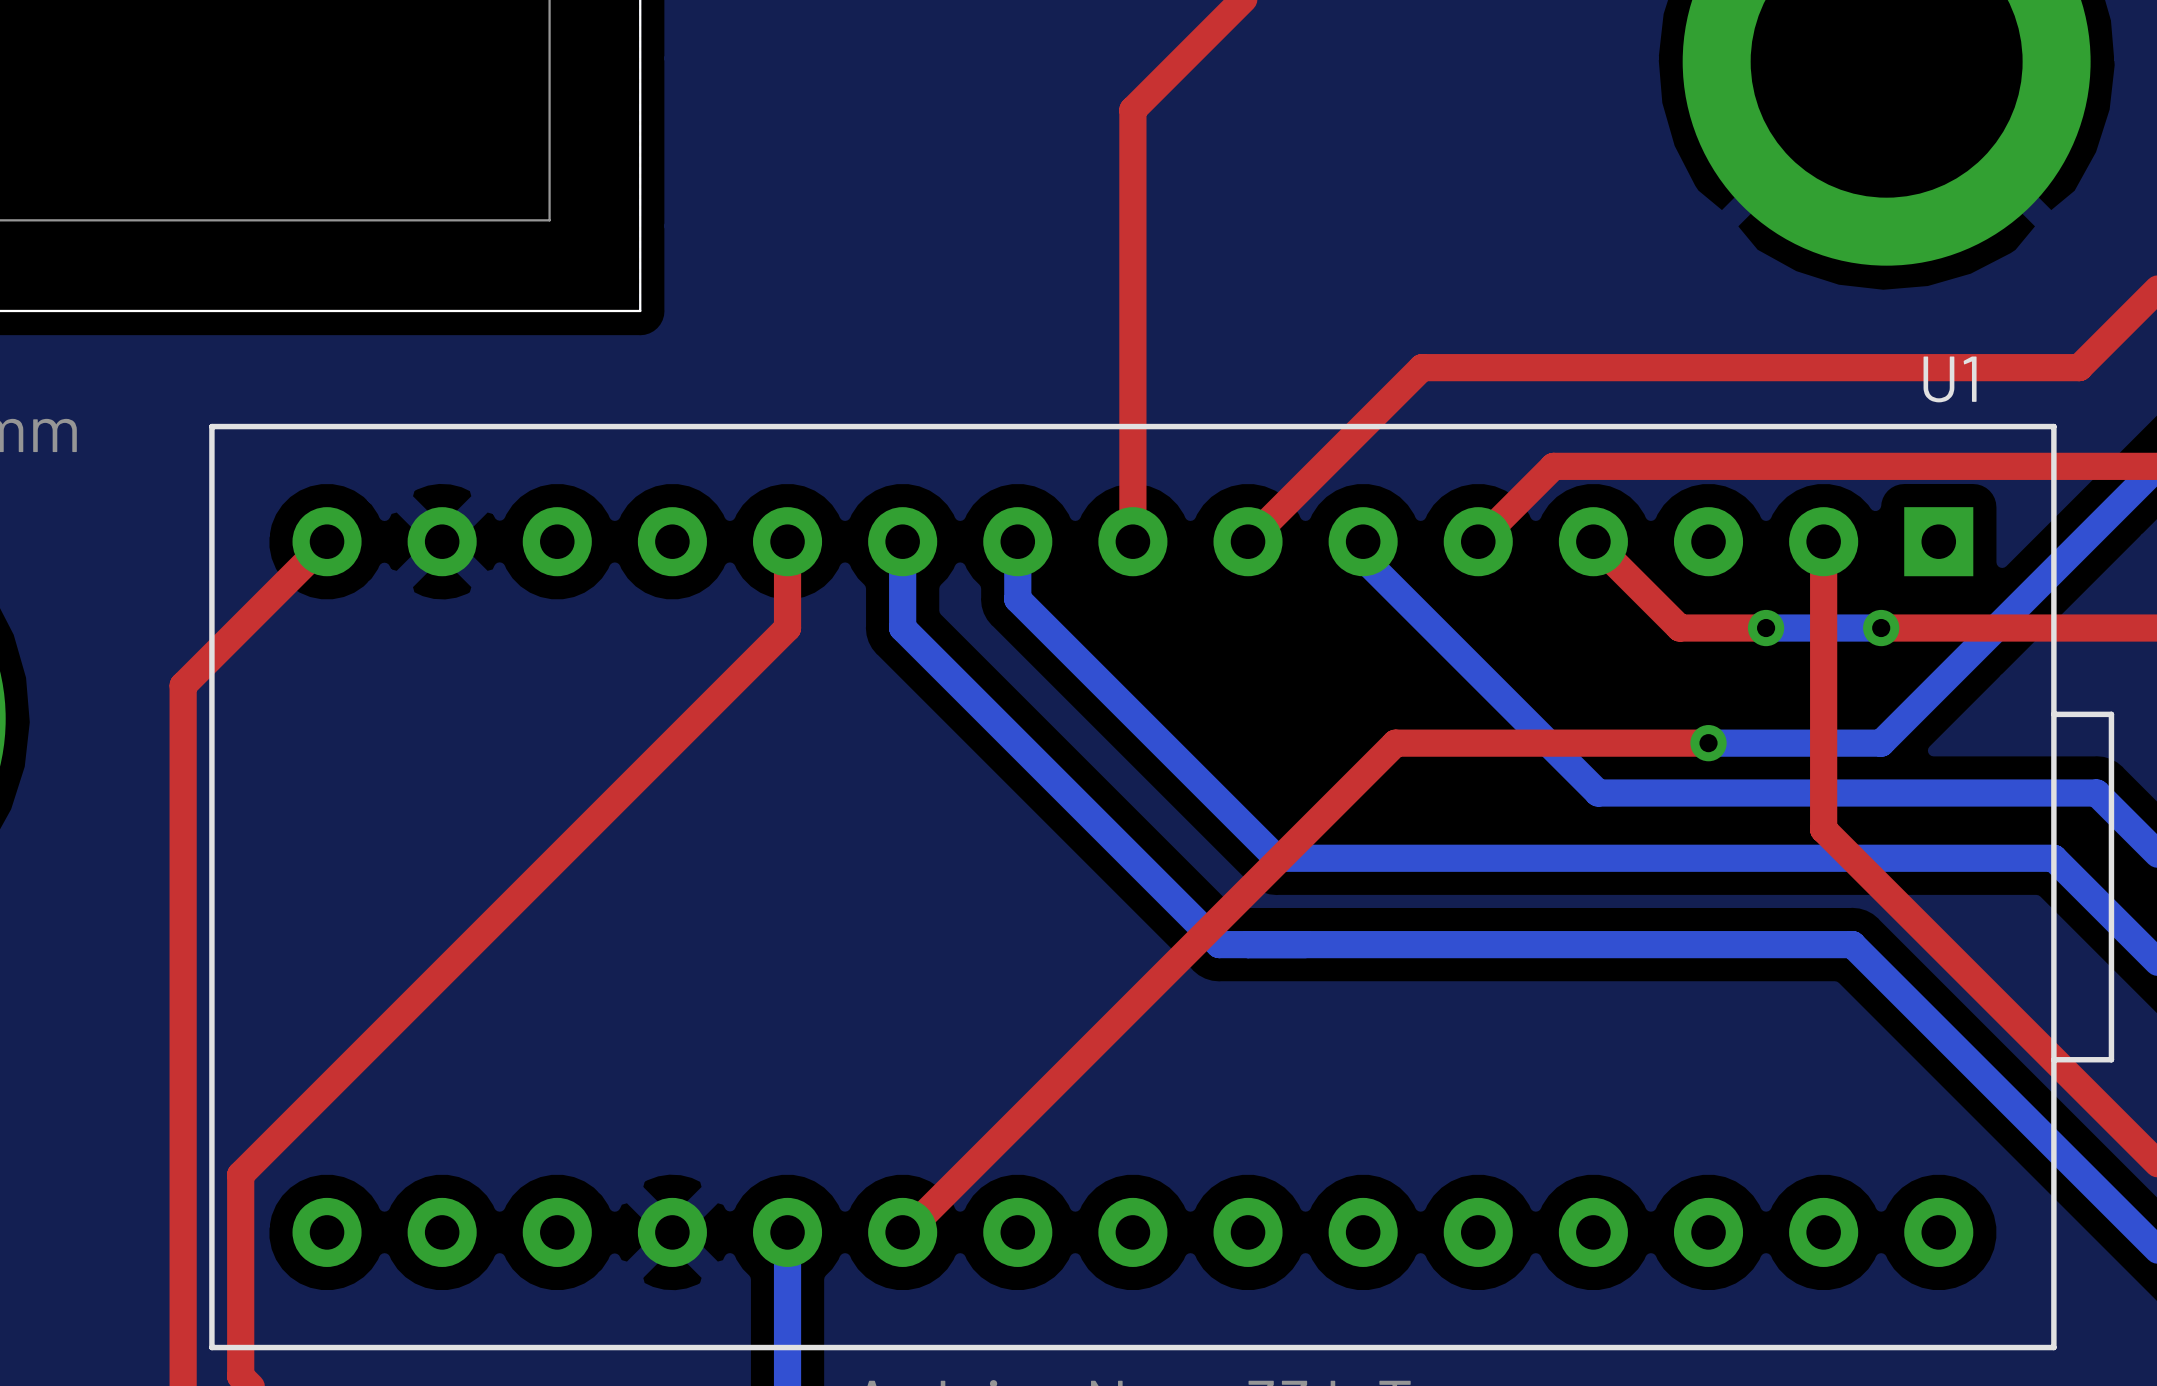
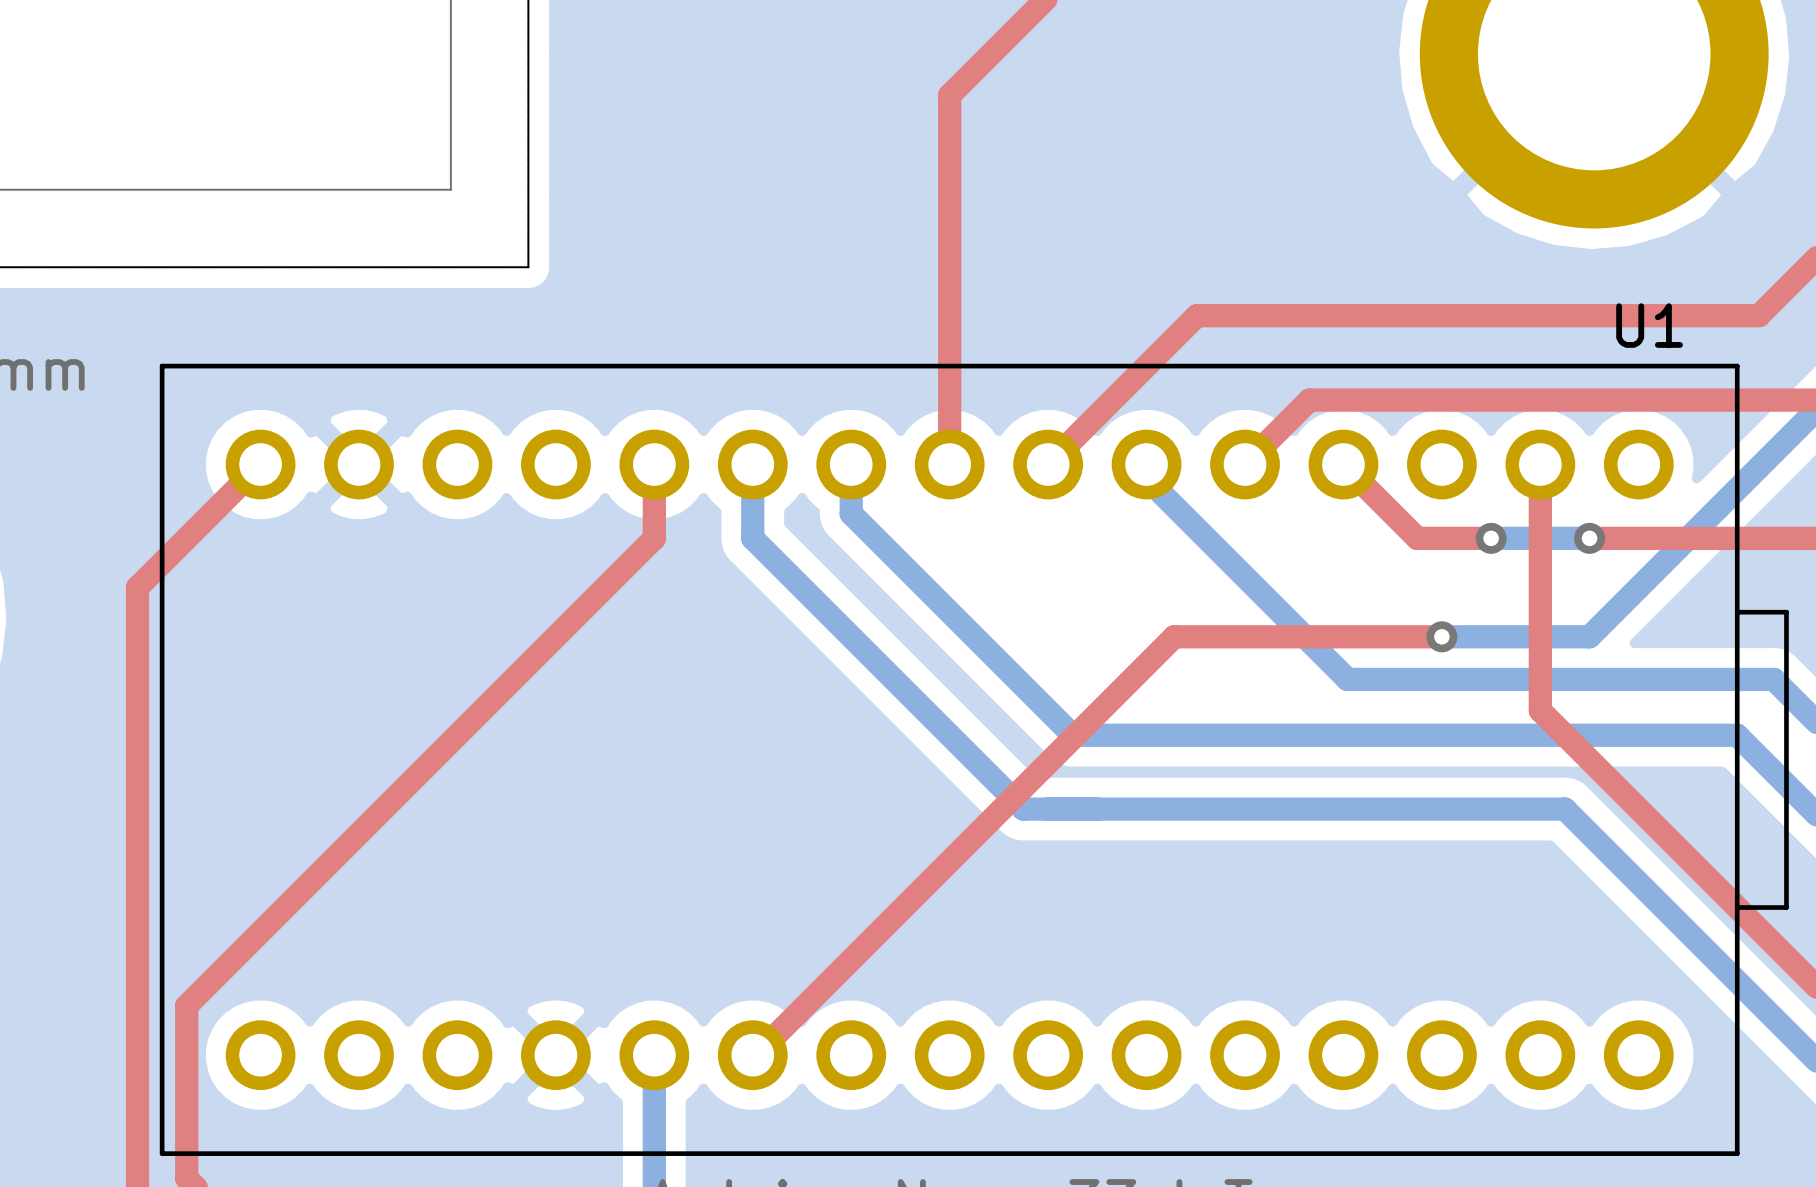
U1 footprint: [209, 423, 2115, 1351] -> [159, 363, 1789, 1156]

